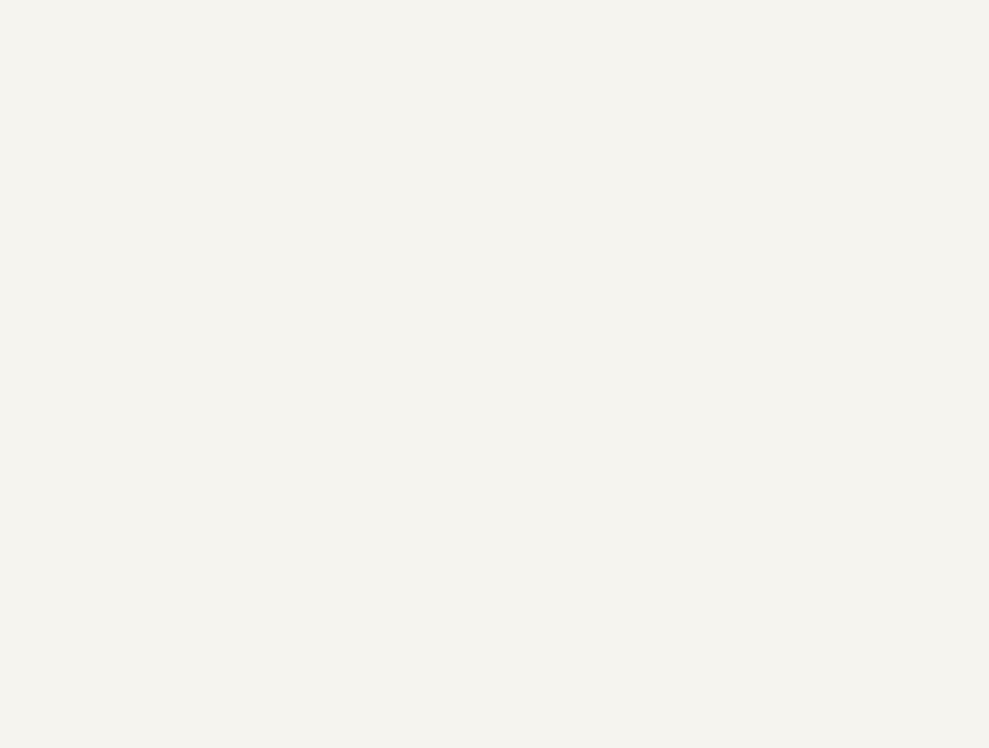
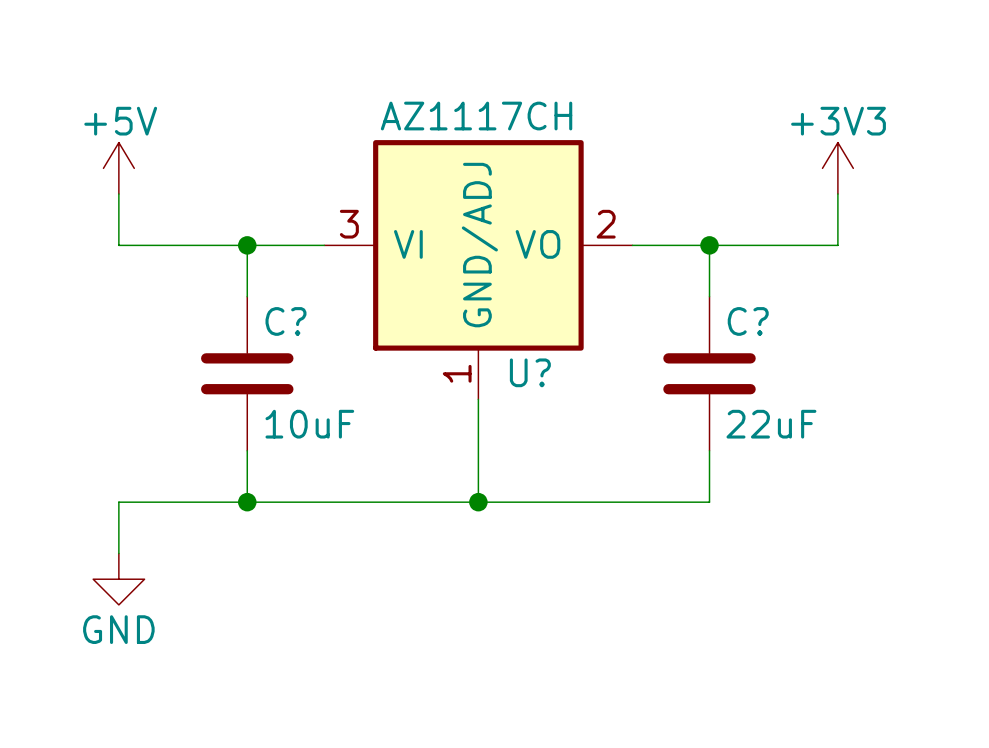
power symbol: none -> +5V (118, 168)
power symbol: none -> +3V3 (837, 168)
wire: none -> (118, 194) (118, 245) (324, 245)
wire: none -> (837, 194) (837, 245) (632, 245)
wire: none -> (247, 245) (247, 296)
junction: none -> (247, 245)
wire: none -> (709, 245) (709, 296)
junction: none -> (709, 245)
U?: none -> AZ1117CH (478, 269)
C?: none -> 10uF (247, 373)
C?: none -> 22uF (709, 373)
wire: none -> (478, 399) (478, 502)
wire: none -> (247, 450) (247, 502)
wire: none -> (709, 450) (709, 502) (118, 502) (118, 553)
junction: none -> (247, 502)
junction: none -> (478, 502)
power symbol: none -> GND (118, 579)

